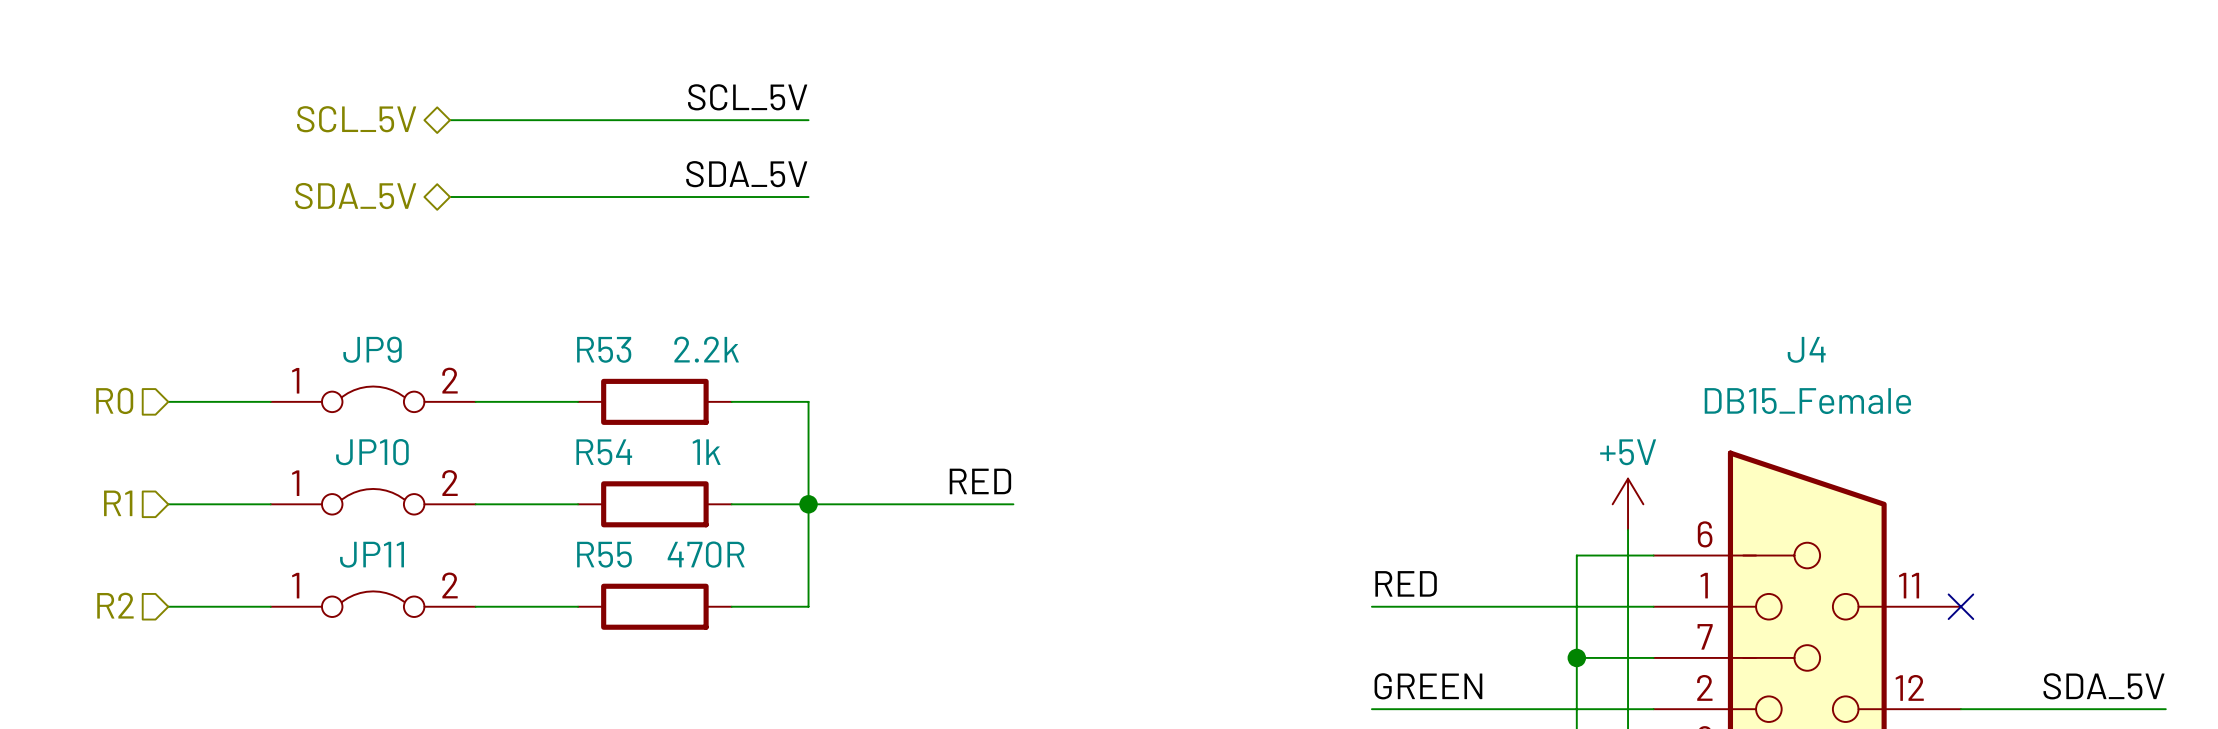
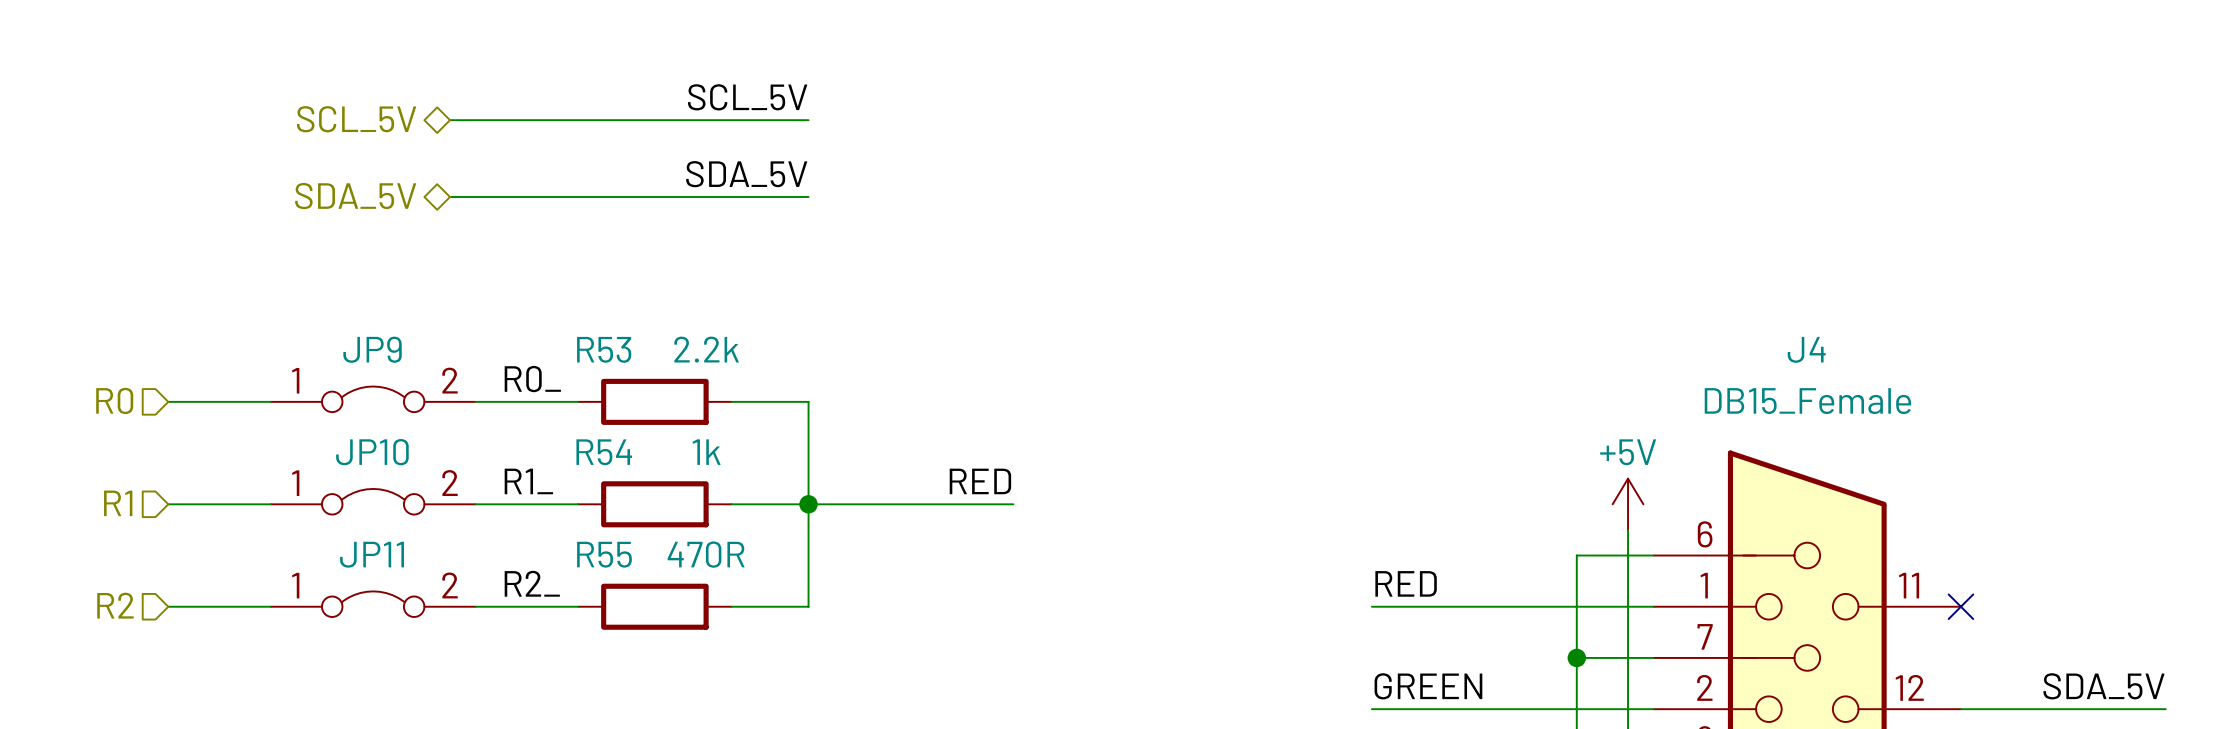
label: none -> R0_ (532, 379)
label: none -> R1_ (528, 481)
label: none -> R2_ (532, 583)

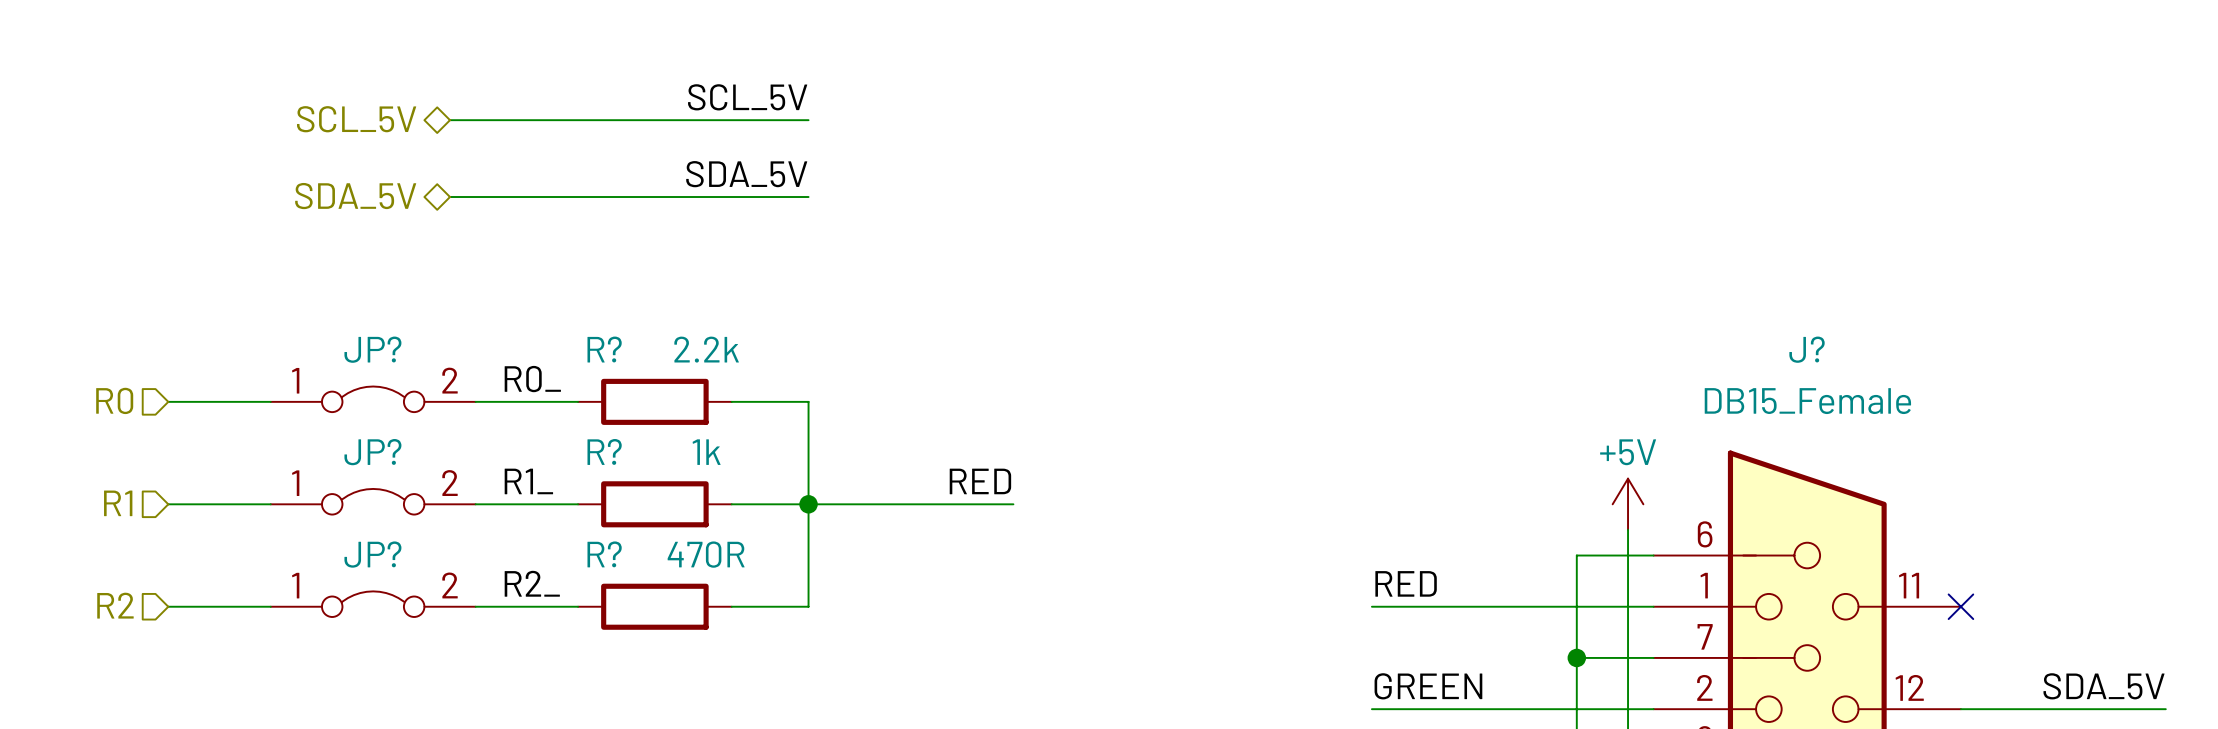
JP9 name: JP9 (372, 349) -> JP? (372, 349)
R53 name: R53 (604, 349) -> R? (604, 349)
J4 name: J4 (1806, 349) -> J? (1807, 349)
JP10 name: JP10 (372, 452) -> JP? (372, 452)
R54 name: R54 (604, 452) -> R? (604, 451)
JP11 name: JP11 (372, 554) -> JP? (372, 554)
R55 name: R55 (604, 554) -> R? (604, 554)

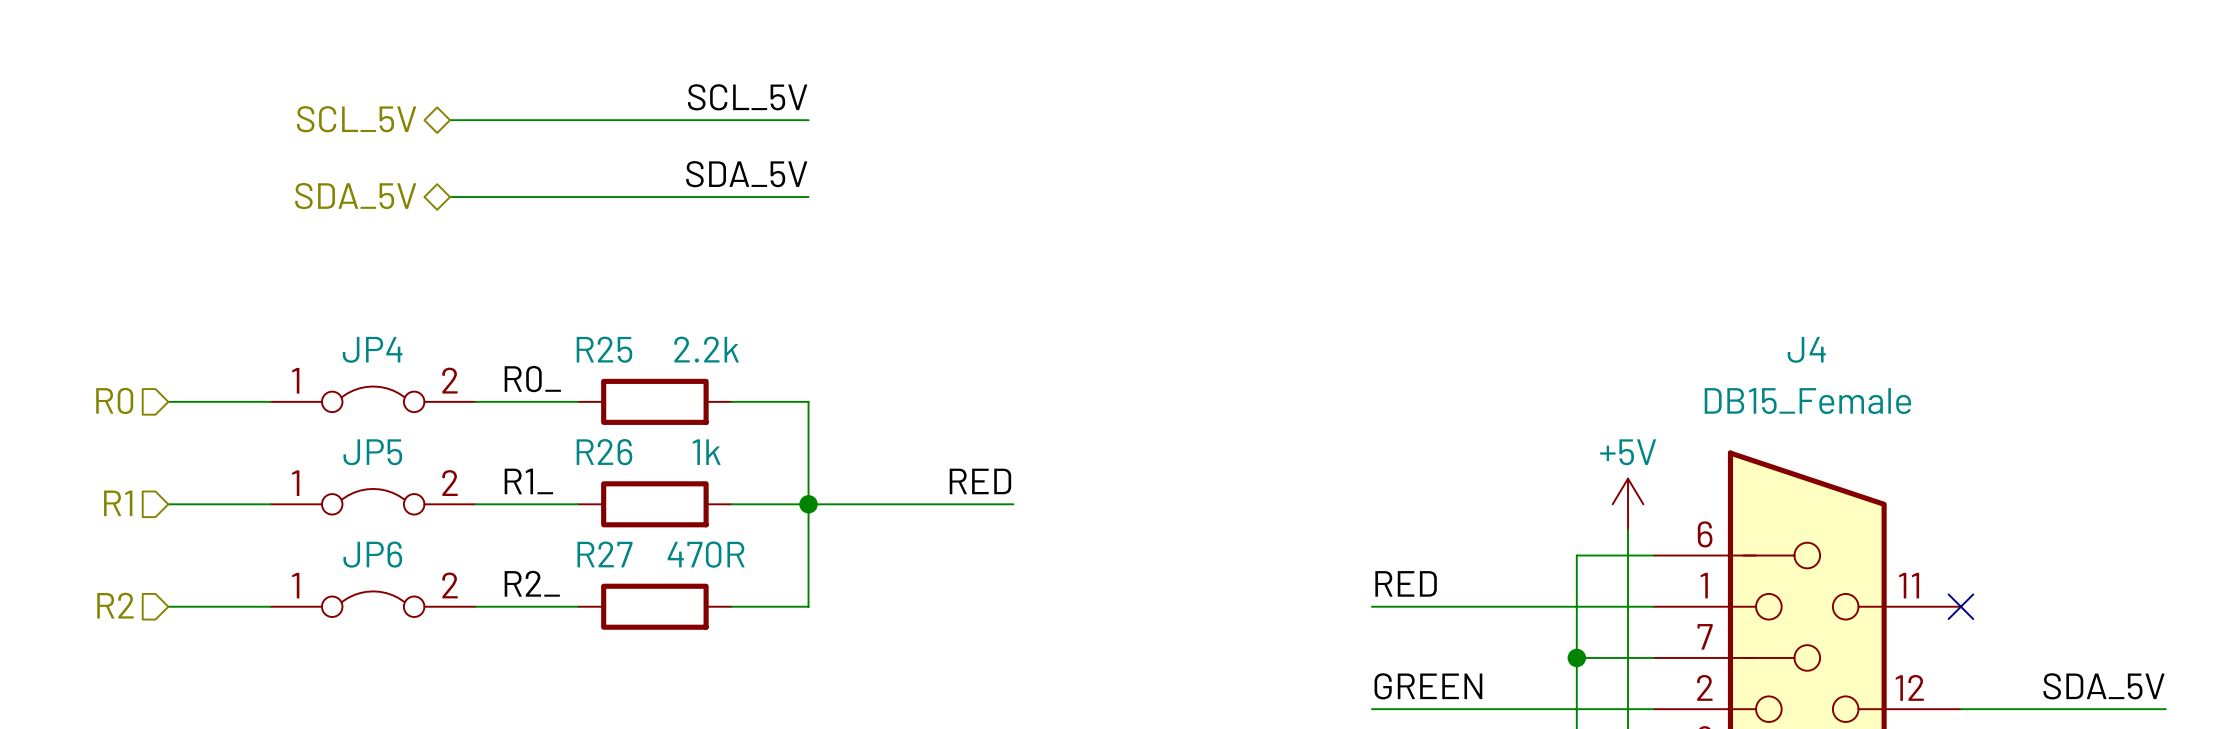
JP? name: JP? (372, 349) -> JP4 (372, 349)
R? name: R? (604, 349) -> R25 (604, 349)
J? name: J? (1807, 349) -> J4 (1806, 349)
R? name: R? (604, 451) -> R26 (604, 452)
JP? name: JP? (372, 452) -> JP5 (372, 452)
JP? name: JP? (372, 554) -> JP6 (372, 554)
R? name: R? (604, 554) -> R27 (604, 554)

